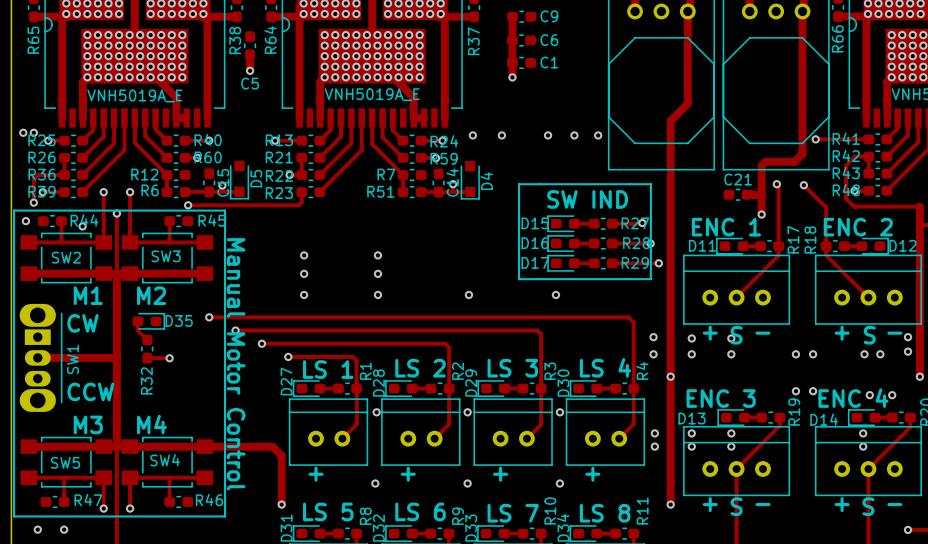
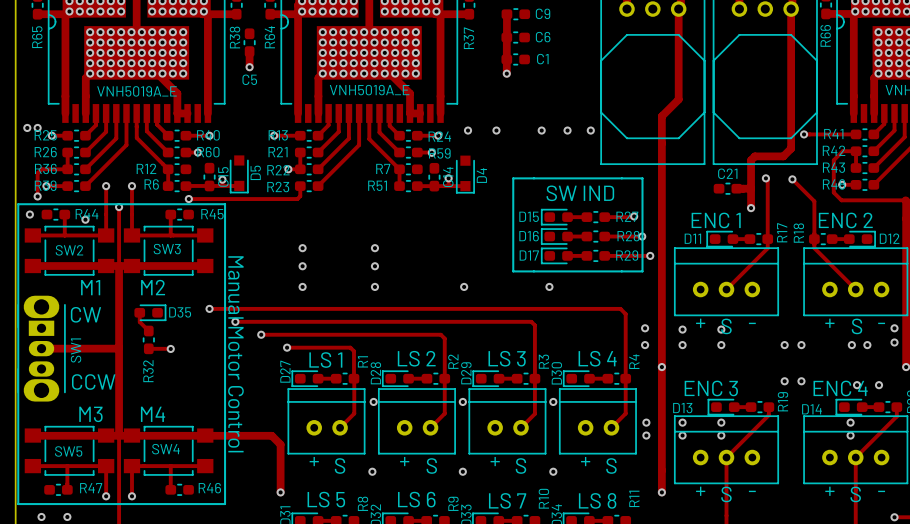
text: none -> S (340, 466)
text: none -> S (431, 466)
text: none -> S (520, 466)
text: none -> S (611, 466)

